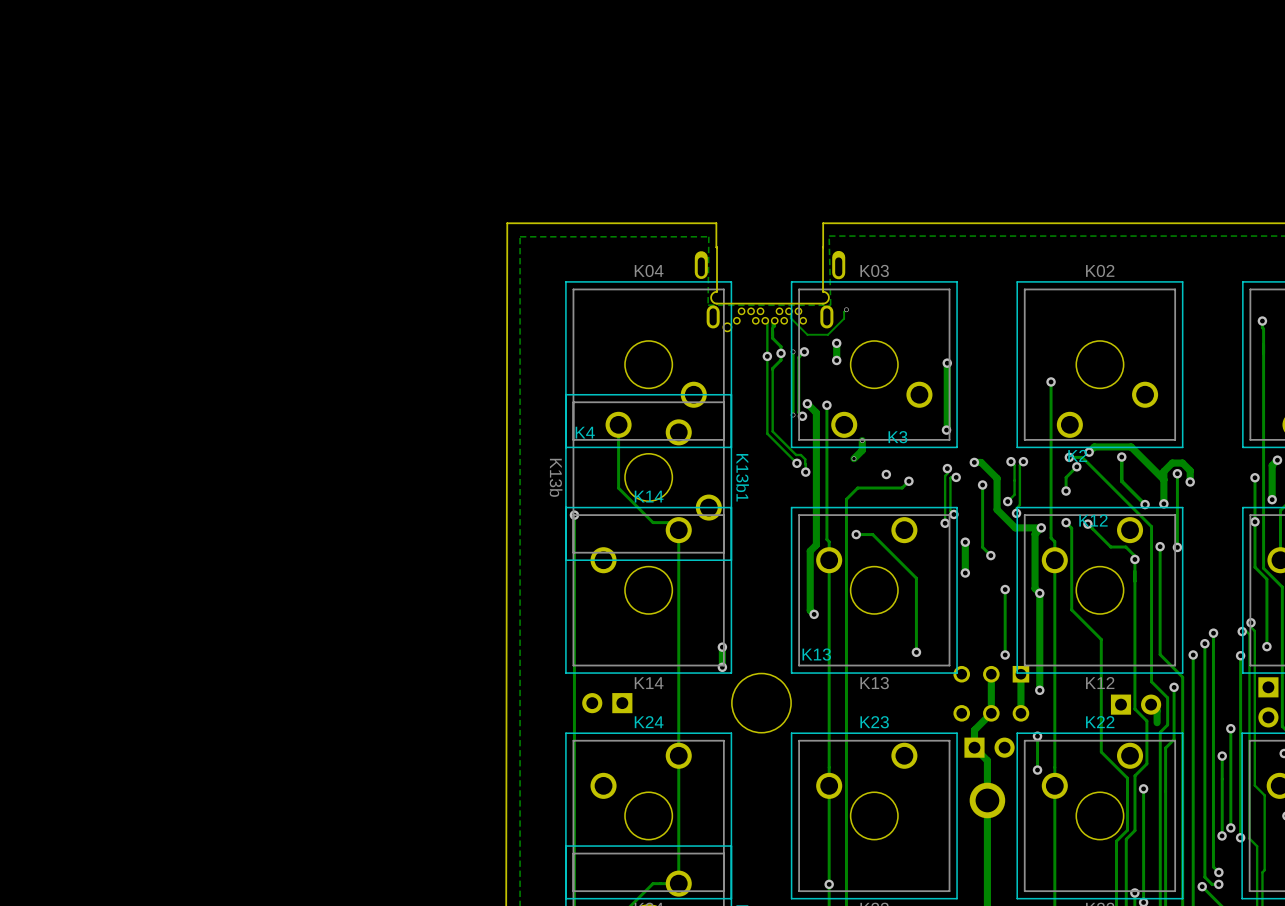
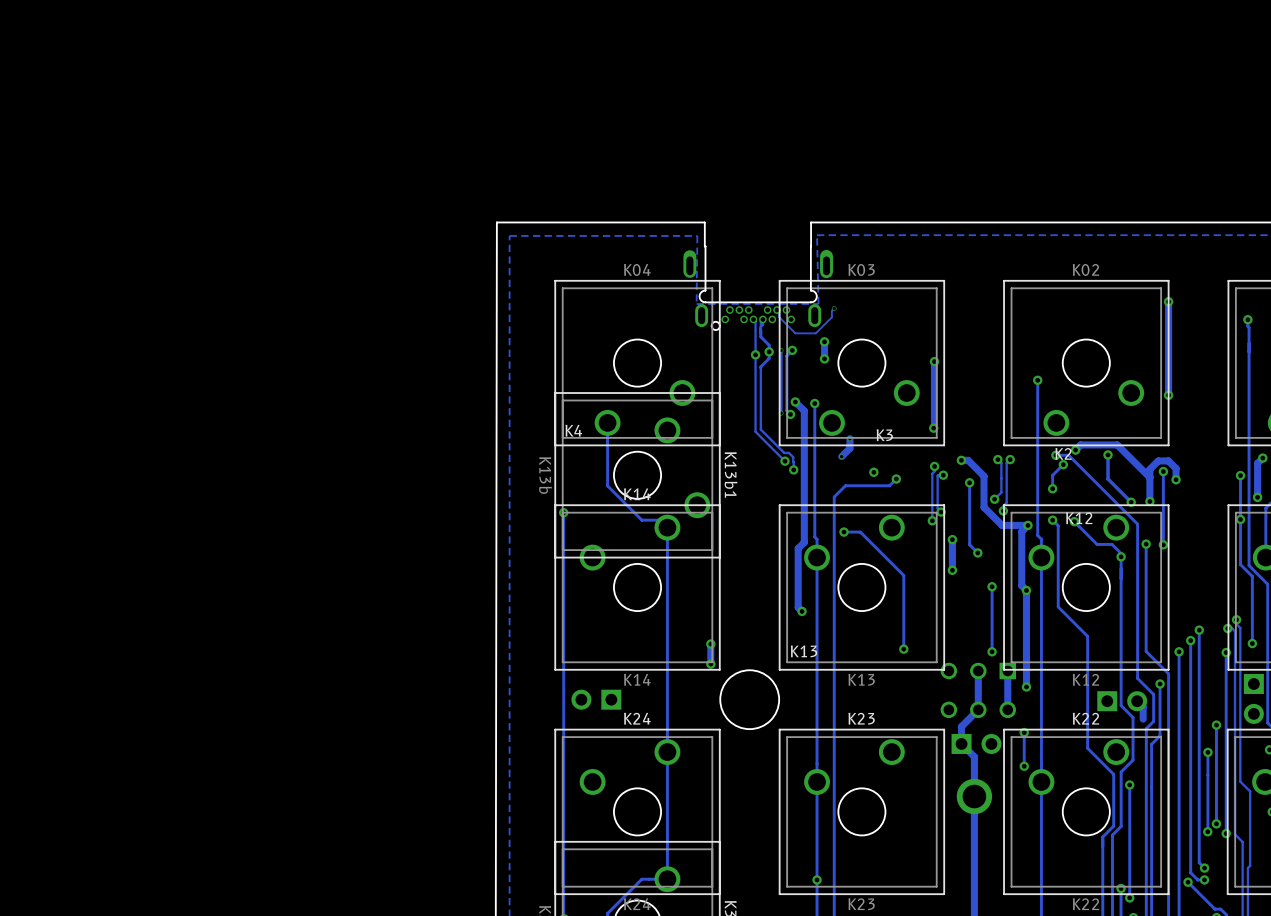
track: none -> (1168, 301) (1168, 395)
via: none -> (1168, 301)
via: none -> (1168, 395)

